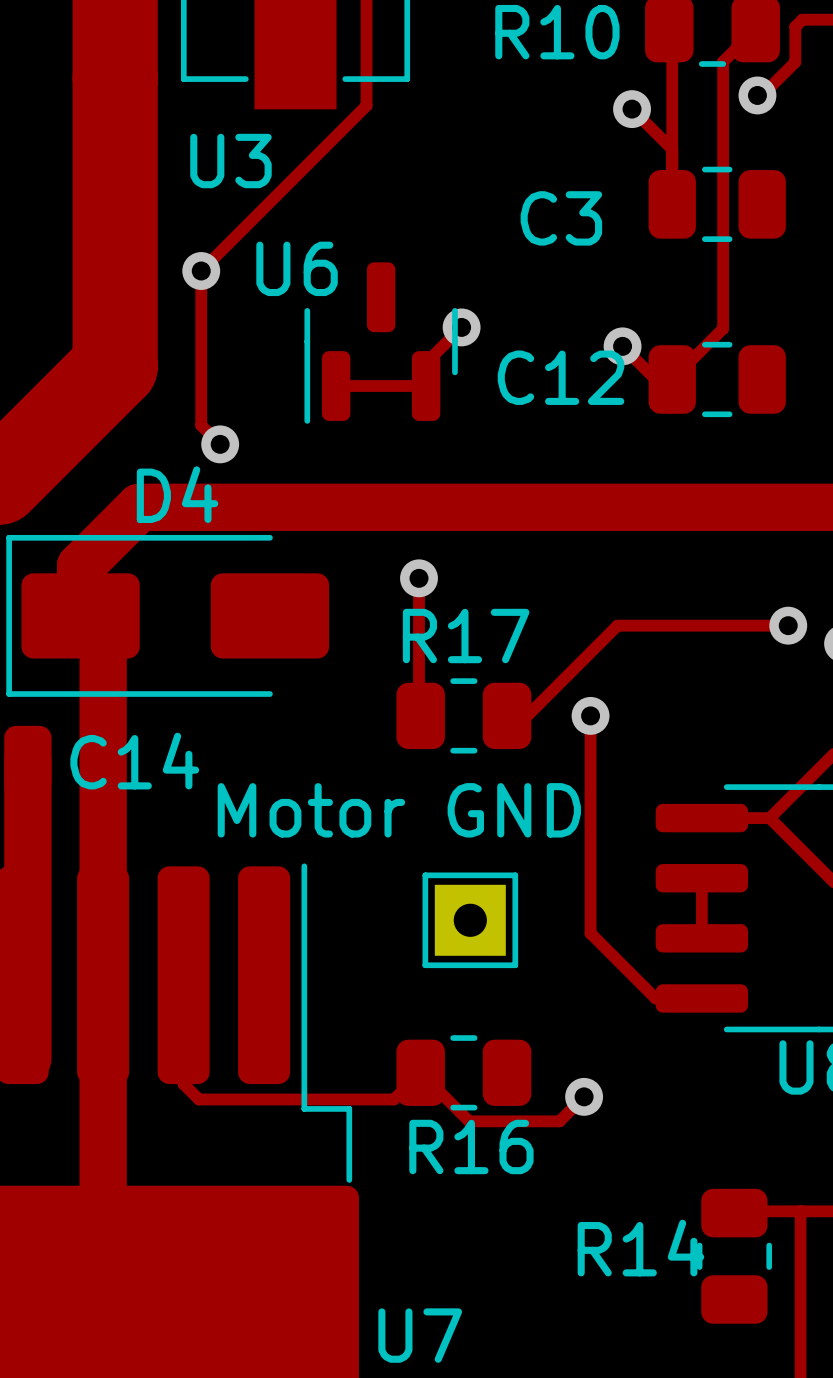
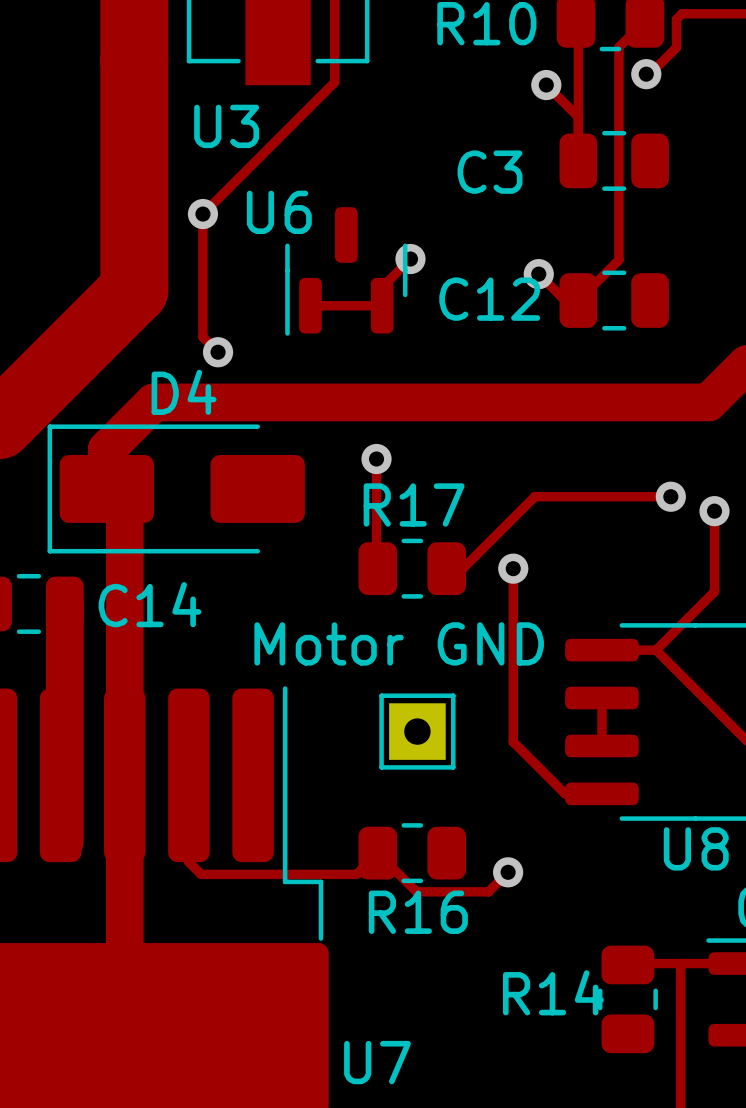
part text position: Motor GND (399, 810) -> Motor GND (399, 643)

